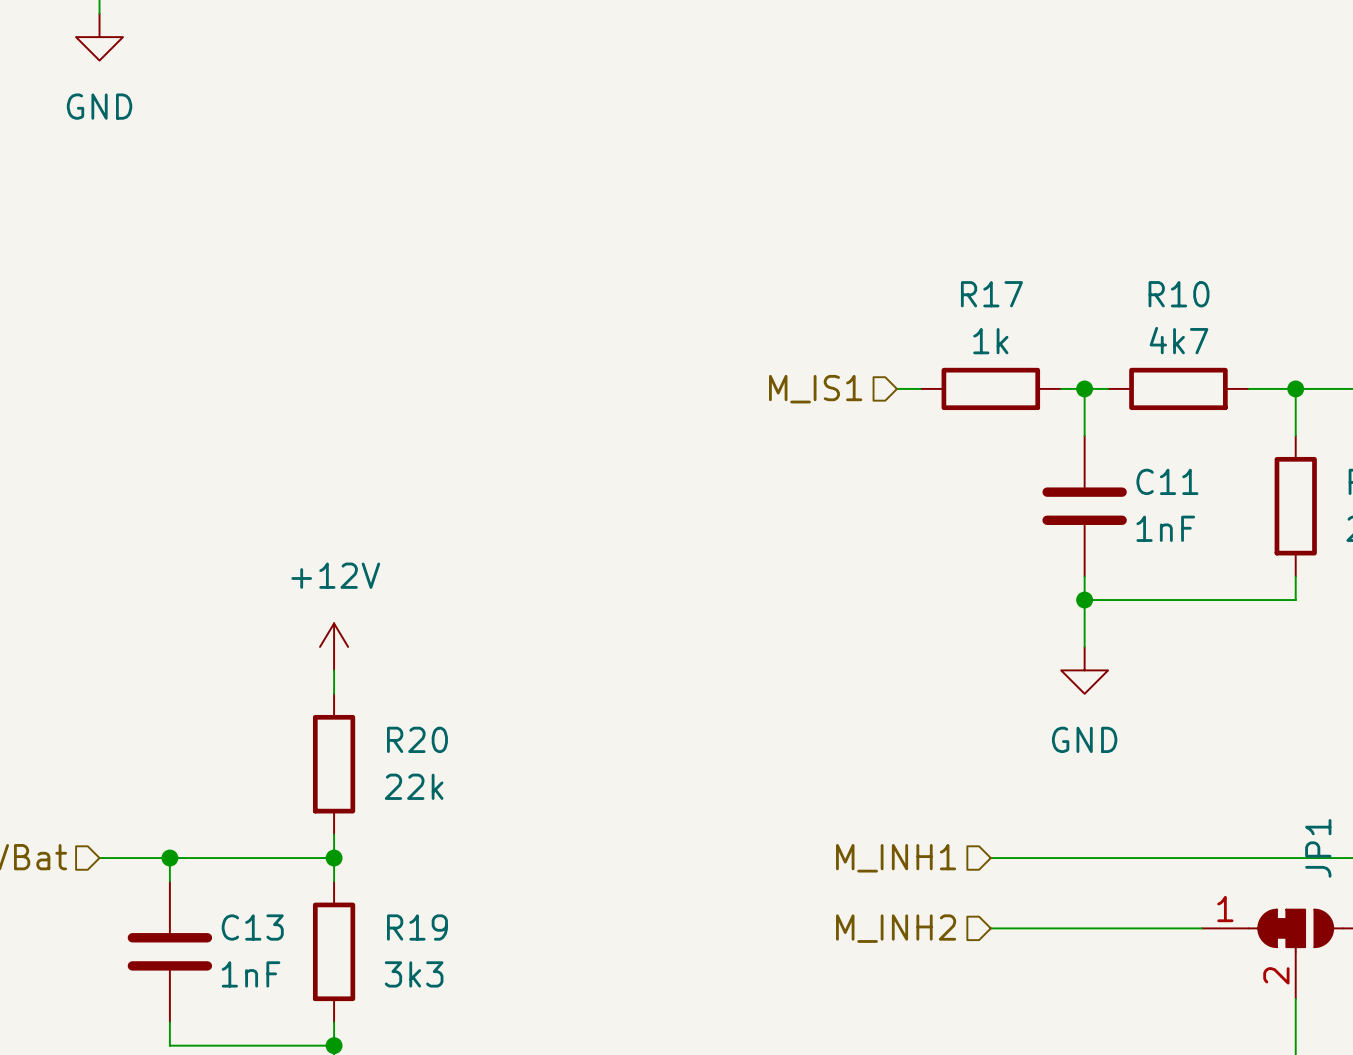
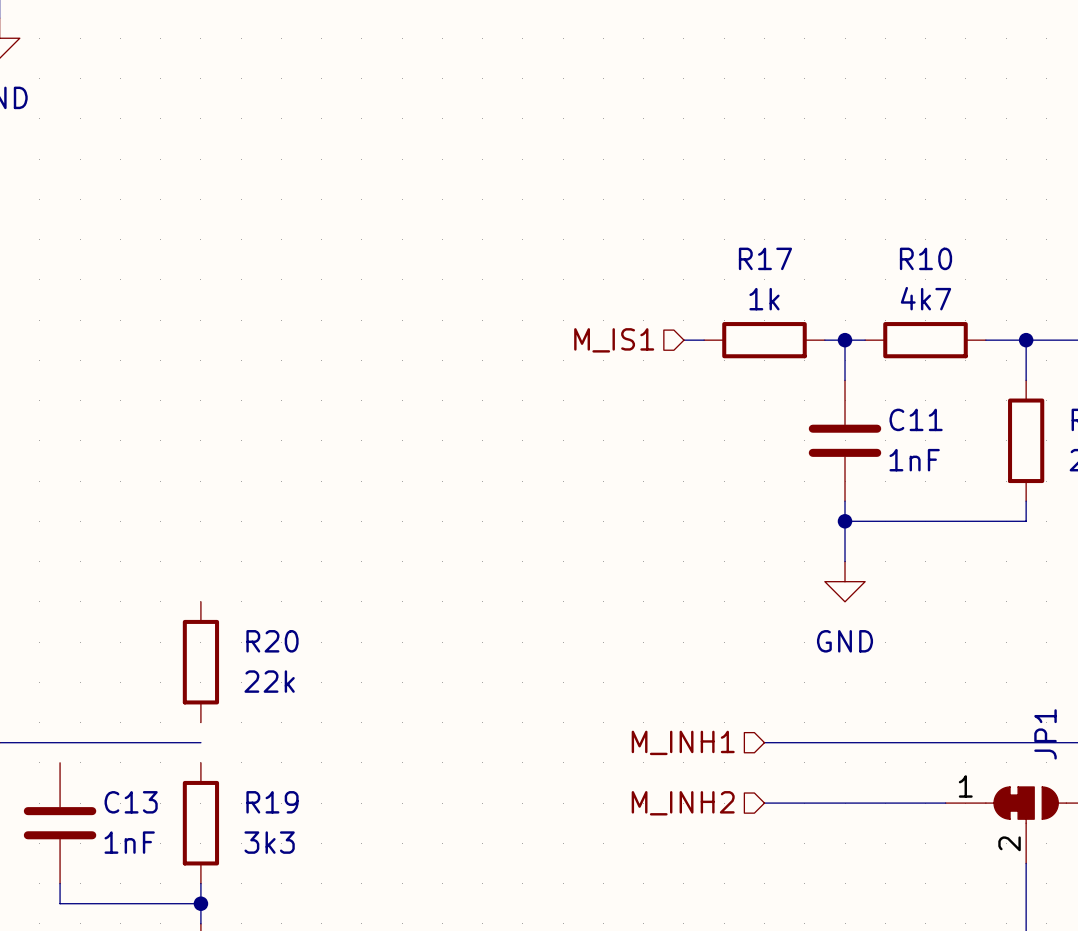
power symbol: +12V (334, 646) -> none
wire: (334, 670) (334, 693) -> none
wire: (334, 834) (334, 881) -> none
wire: (169, 858) (169, 881) -> none
junction: (169, 858) -> none
junction: (334, 858) -> none

